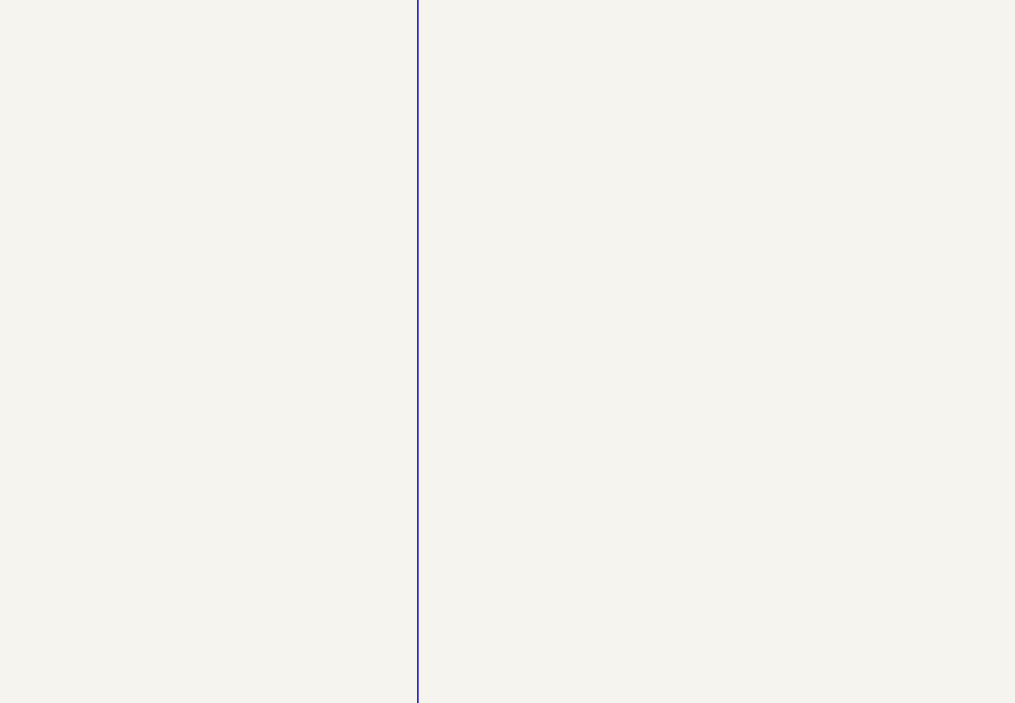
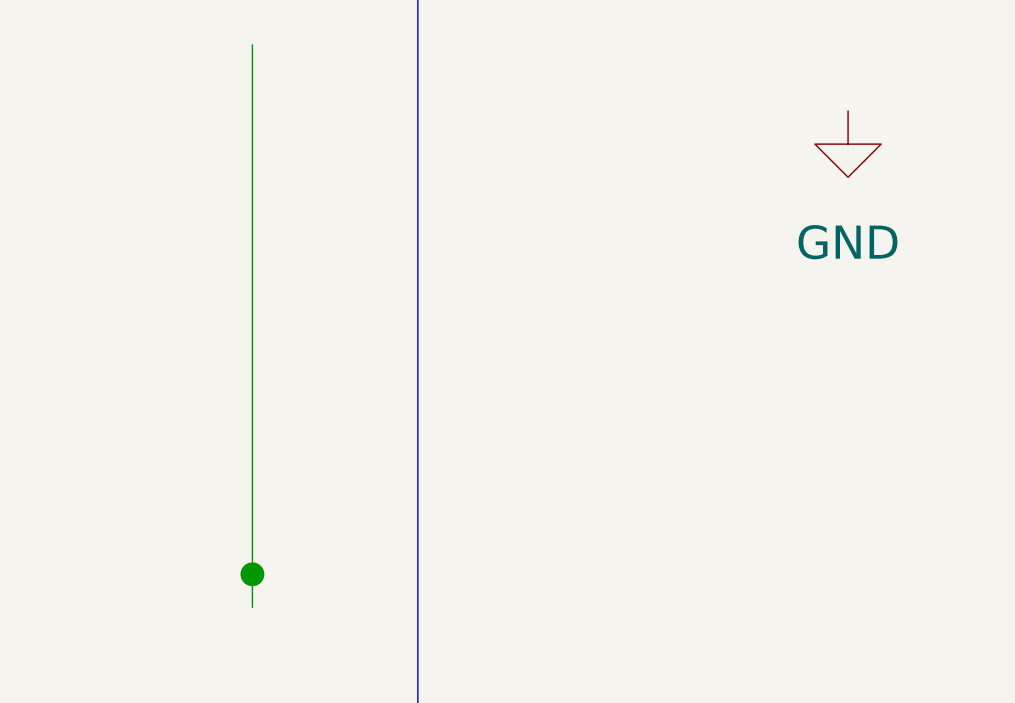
wire: none -> (252, 44) (252, 607)
power symbol: none -> GND (848, 144)
junction: none -> (252, 574)

